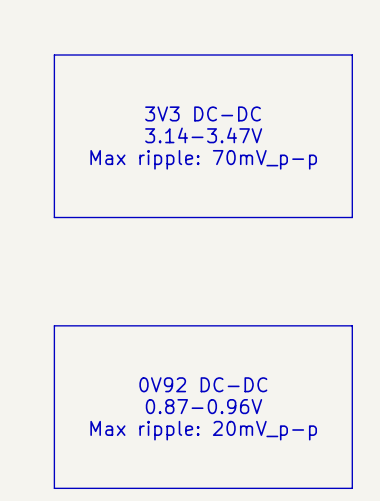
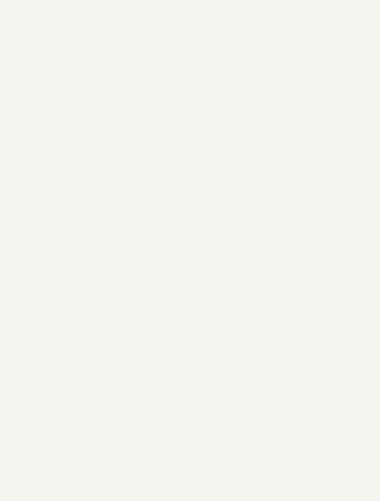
line: (54, 55) (54, 217) (352, 217) (352, 55) (54, 55) -> none
text: 3V3 DC-DC (203, 113) -> none
text: 3.14-3.47V (203, 135) -> none
text: Max ripple: 70mV_p-p (203, 159) -> none
line: (54, 325) (352, 325) (352, 488) (54, 488) (54, 325) -> none
text: 0V92 DC-DC (203, 384) -> none
text: 0.87-0.96V (203, 406) -> none
text: Max ripple: 20mV_p-p (203, 430) -> none

